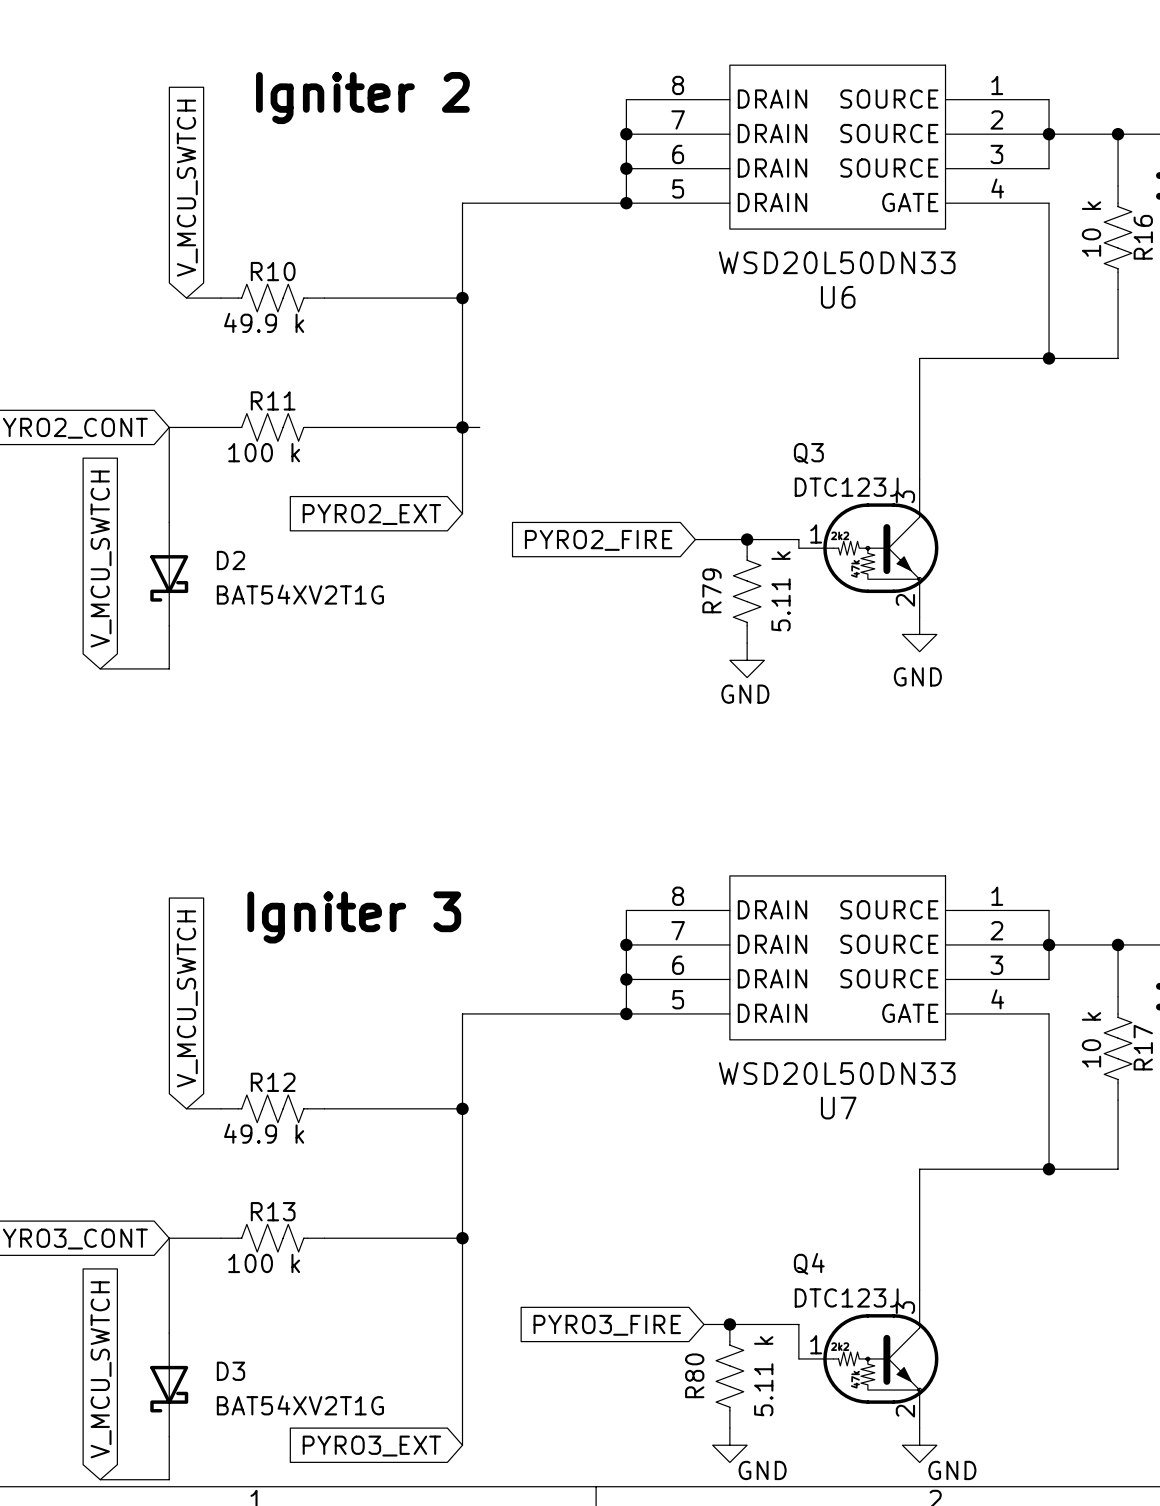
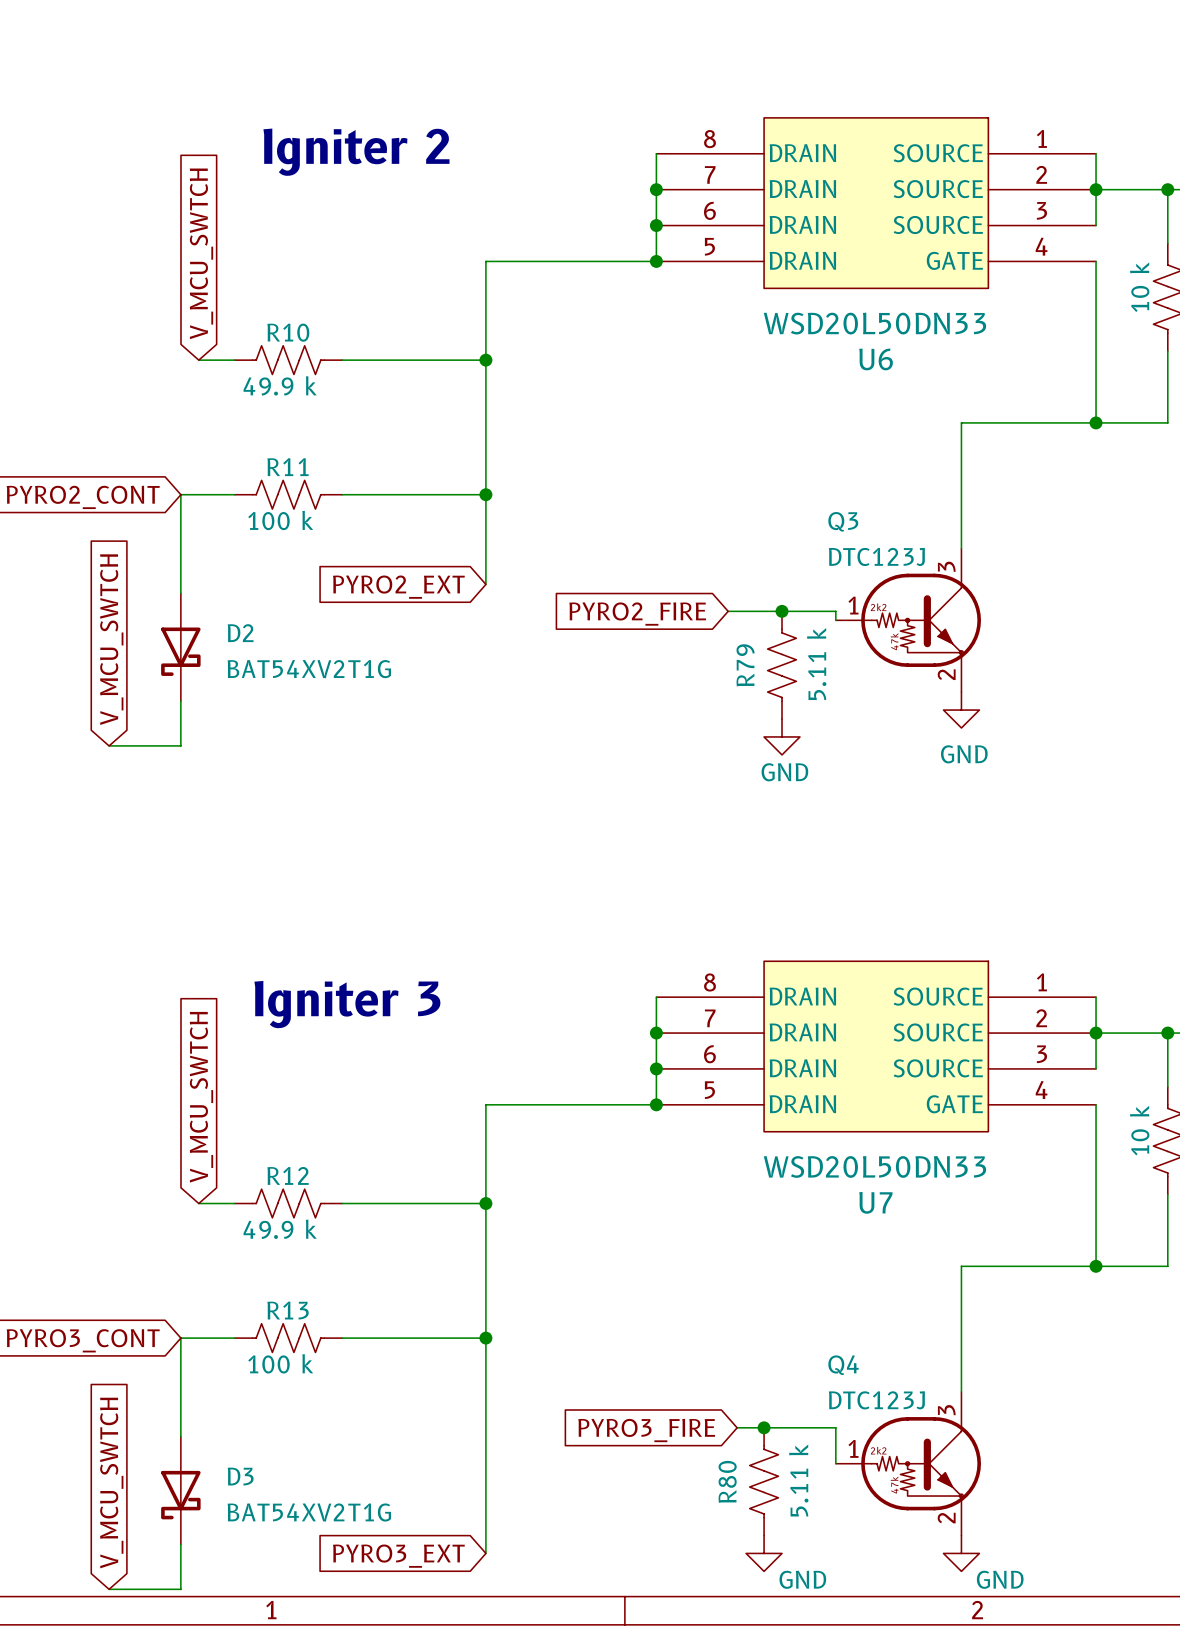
wire: (462, 427) (479, 427) -> none

